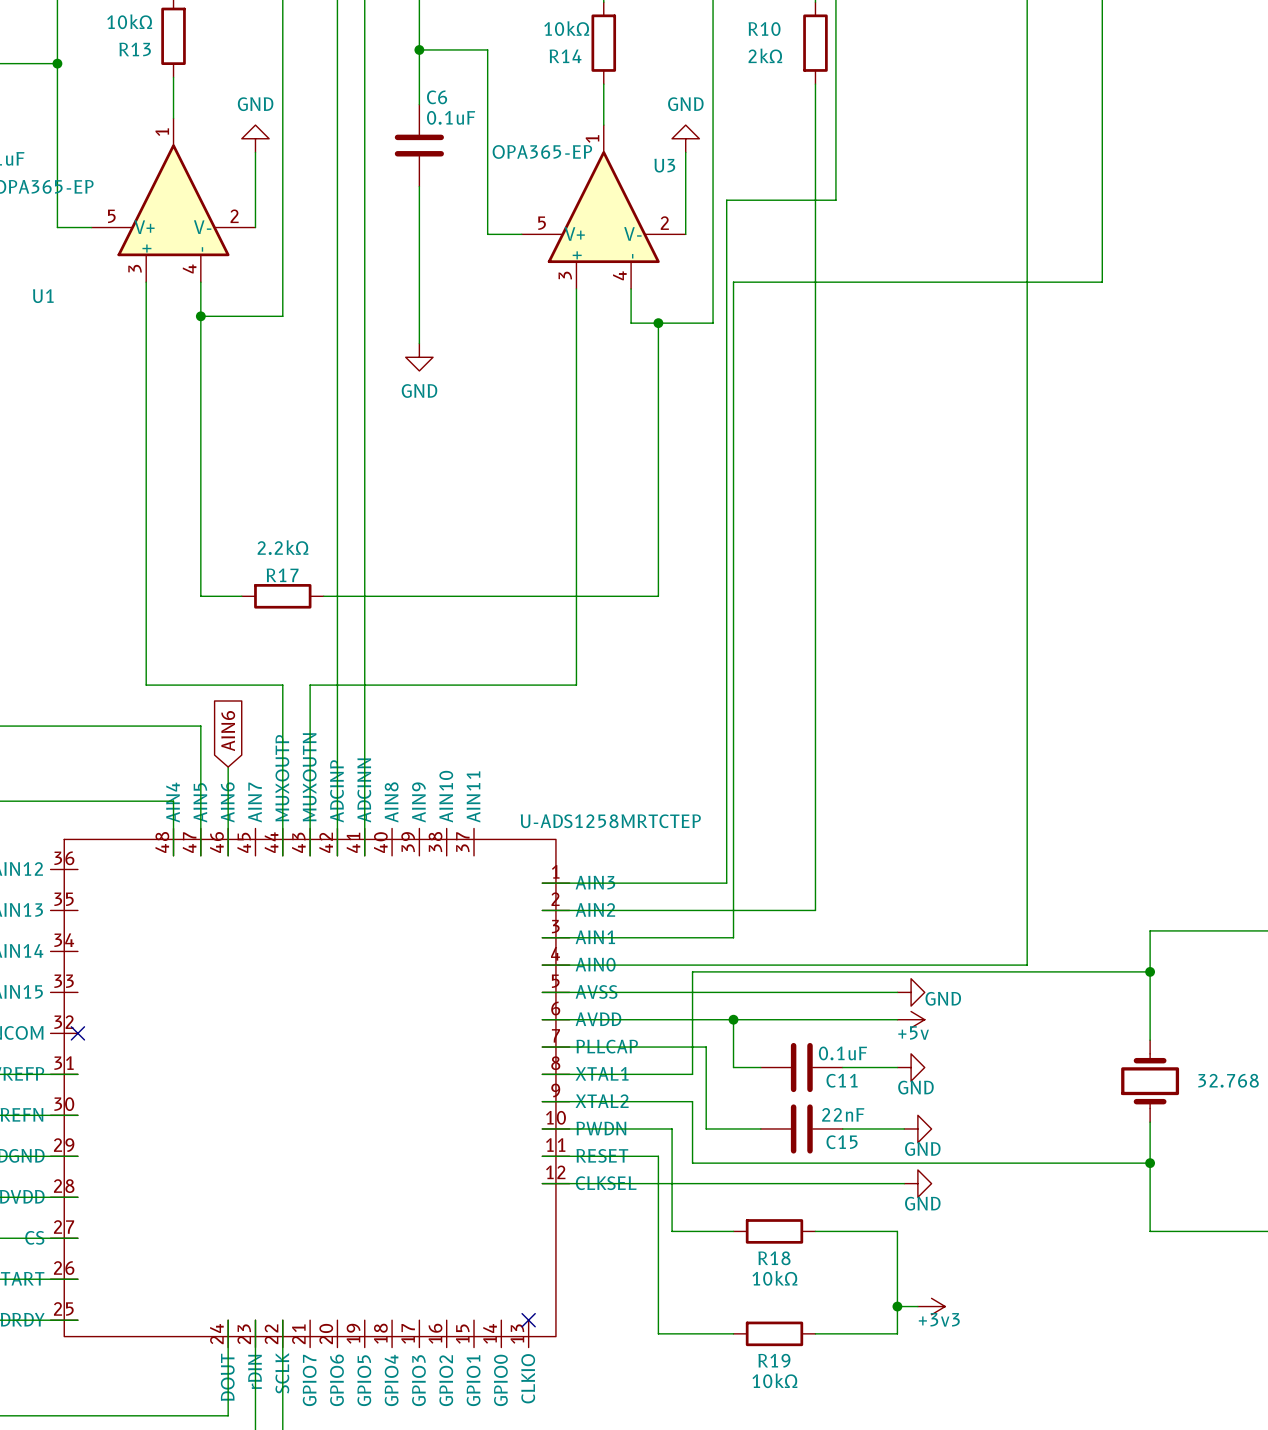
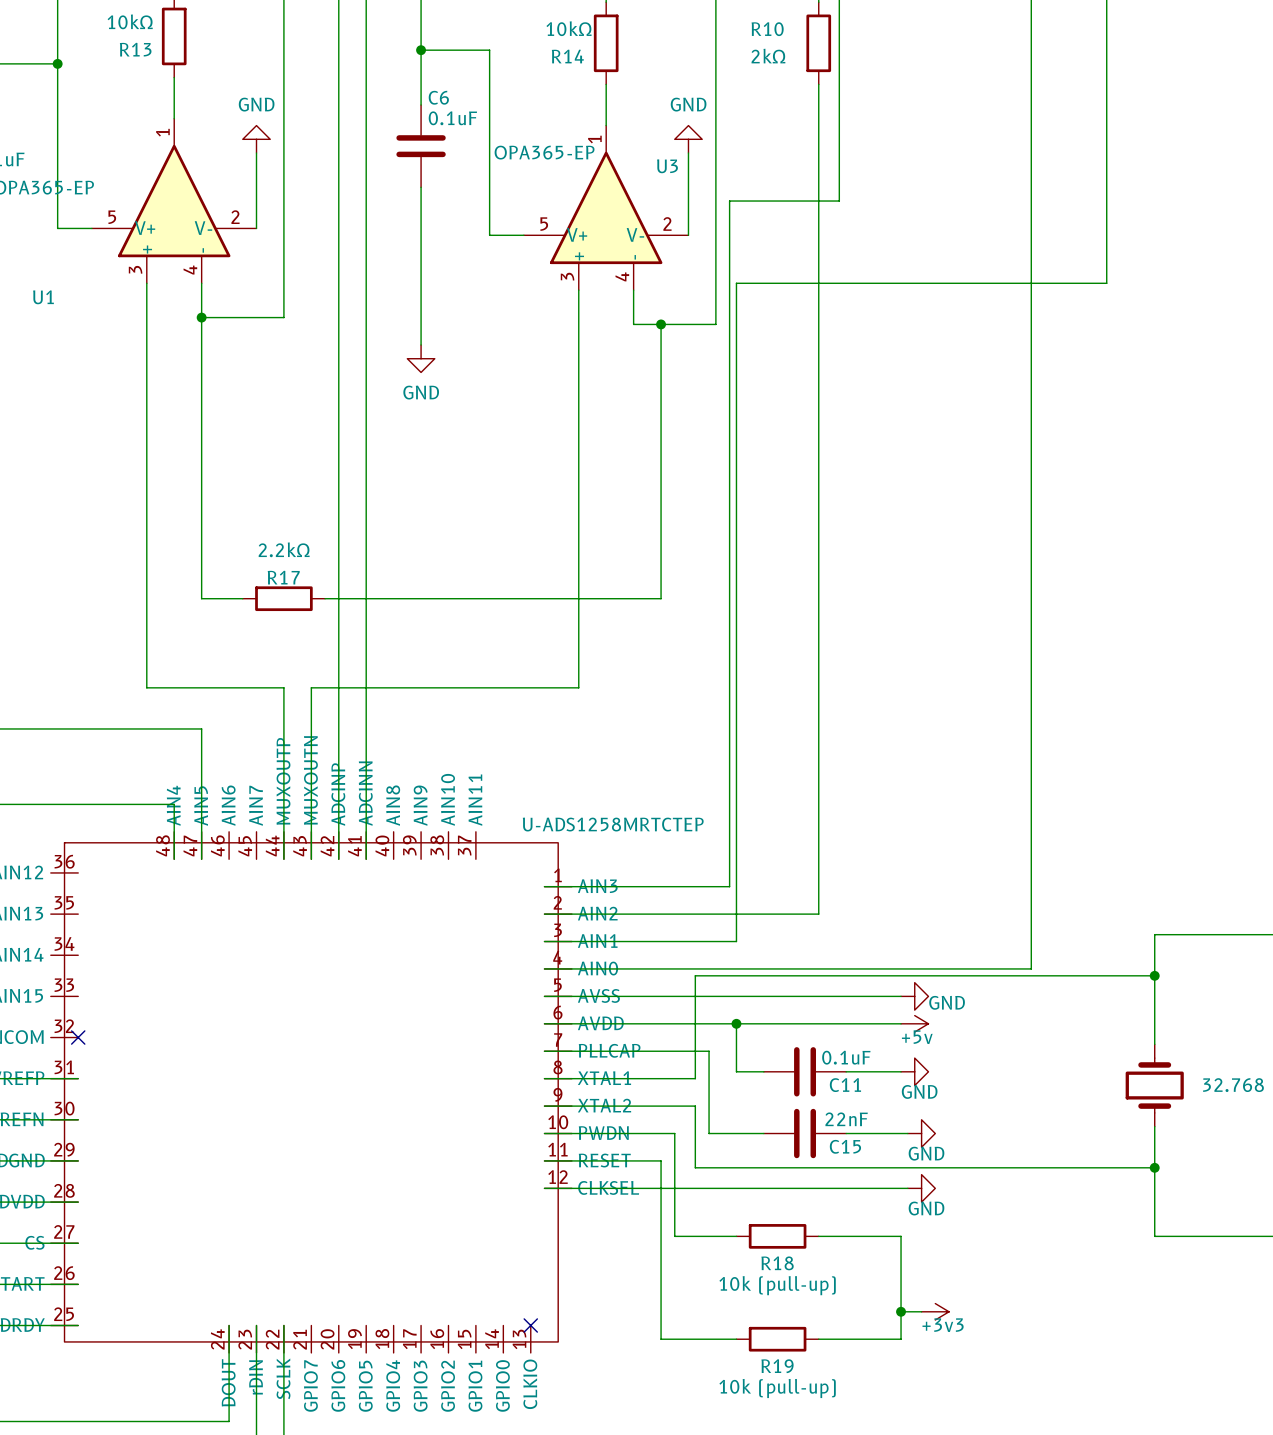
global label: AIN6 (228, 731) -> none
wire: (228, 767) (228, 855) -> none
R18 value: 10kΩ (774, 1278) -> 10k (pull-up) (777, 1285)
R19 value: 10kΩ (774, 1380) -> 10k (pull-up) (777, 1388)

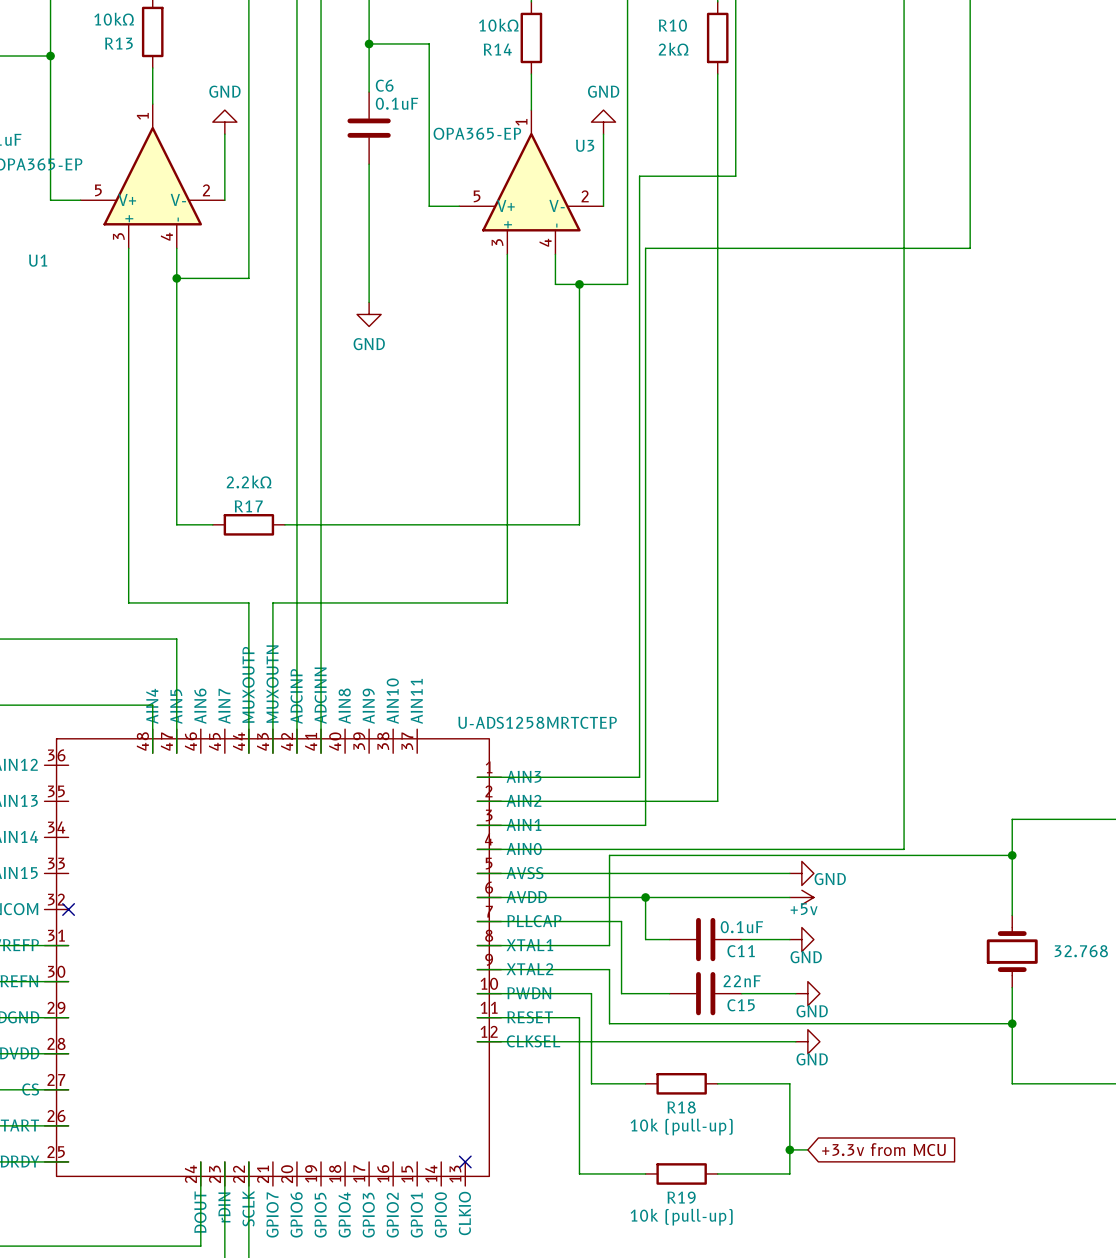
power symbol: +3v3 (935, 1311) -> none
global label: none -> +3.3v from MCU (883, 1149)

